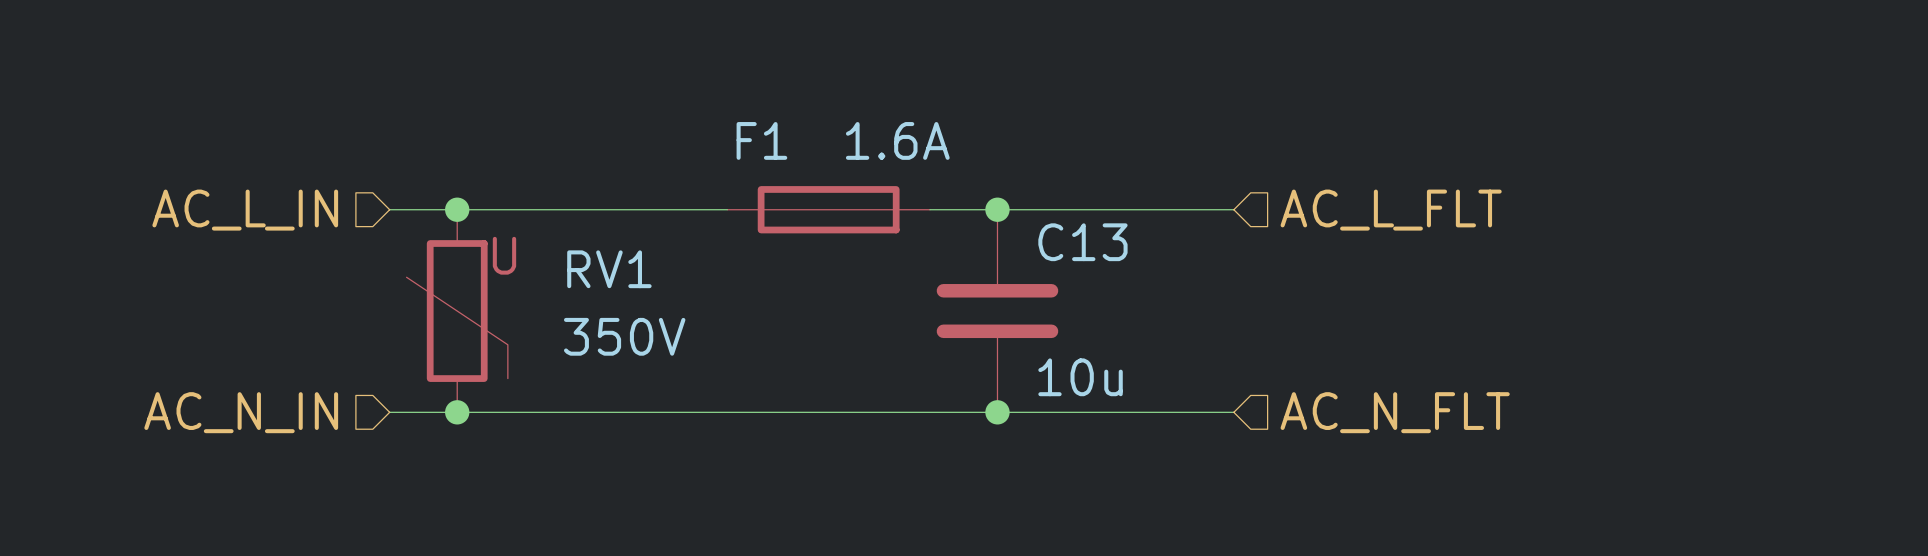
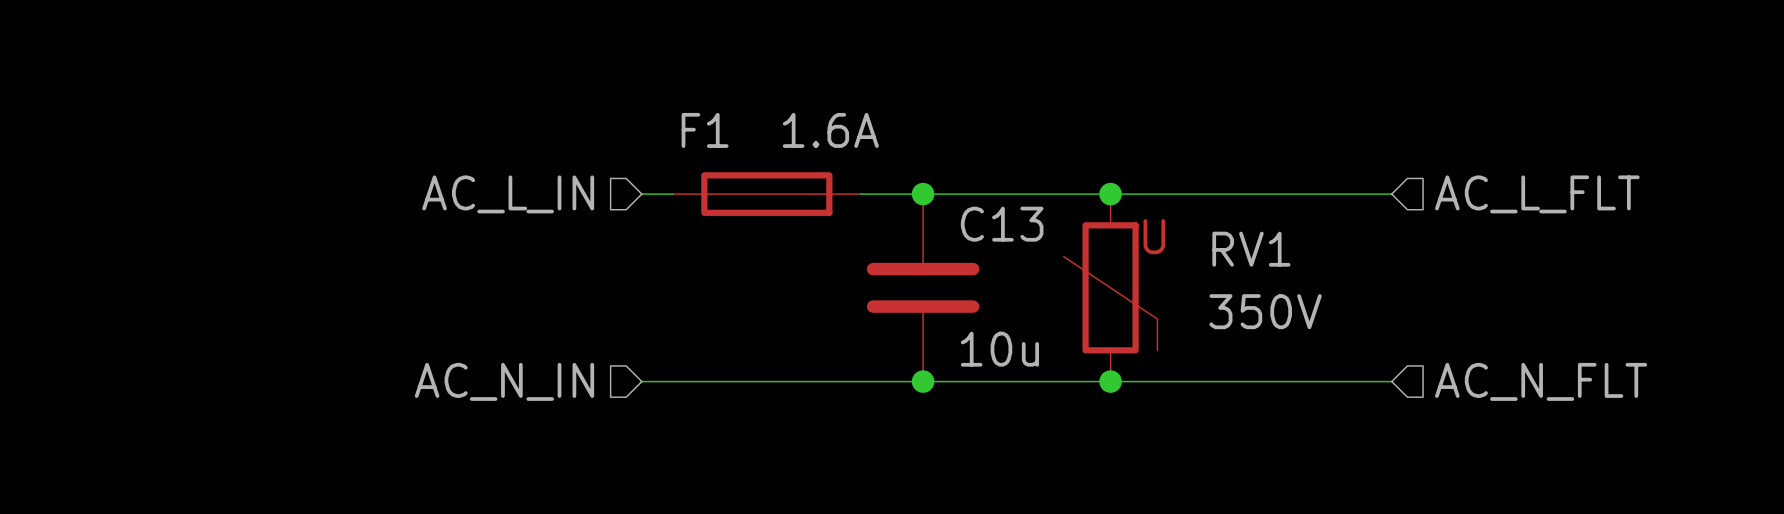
wire: (389, 209) (693, 209) -> none
junction: (457, 209) -> none
junction: none -> (1110, 194)
wire: none -> (1141, 194) (1391, 194)
hierarchical label position: AC_L_IN (245, 210) -> AC_L_IN (508, 194)
hierarchical label position: AC_L_FLT (1391, 210) -> AC_L_FLT (1537, 194)
RV1 position: (457, 311) -> (1110, 287)
hierarchical label position: AC_N_IN (241, 412) -> AC_N_IN (504, 381)
wire: (389, 412) (693, 412) -> none
junction: (457, 412) -> none
junction: none -> (1110, 381)
wire: none -> (1141, 381) (1391, 381)
hierarchical label position: AC_N_FLT (1395, 412) -> AC_N_FLT (1541, 381)

